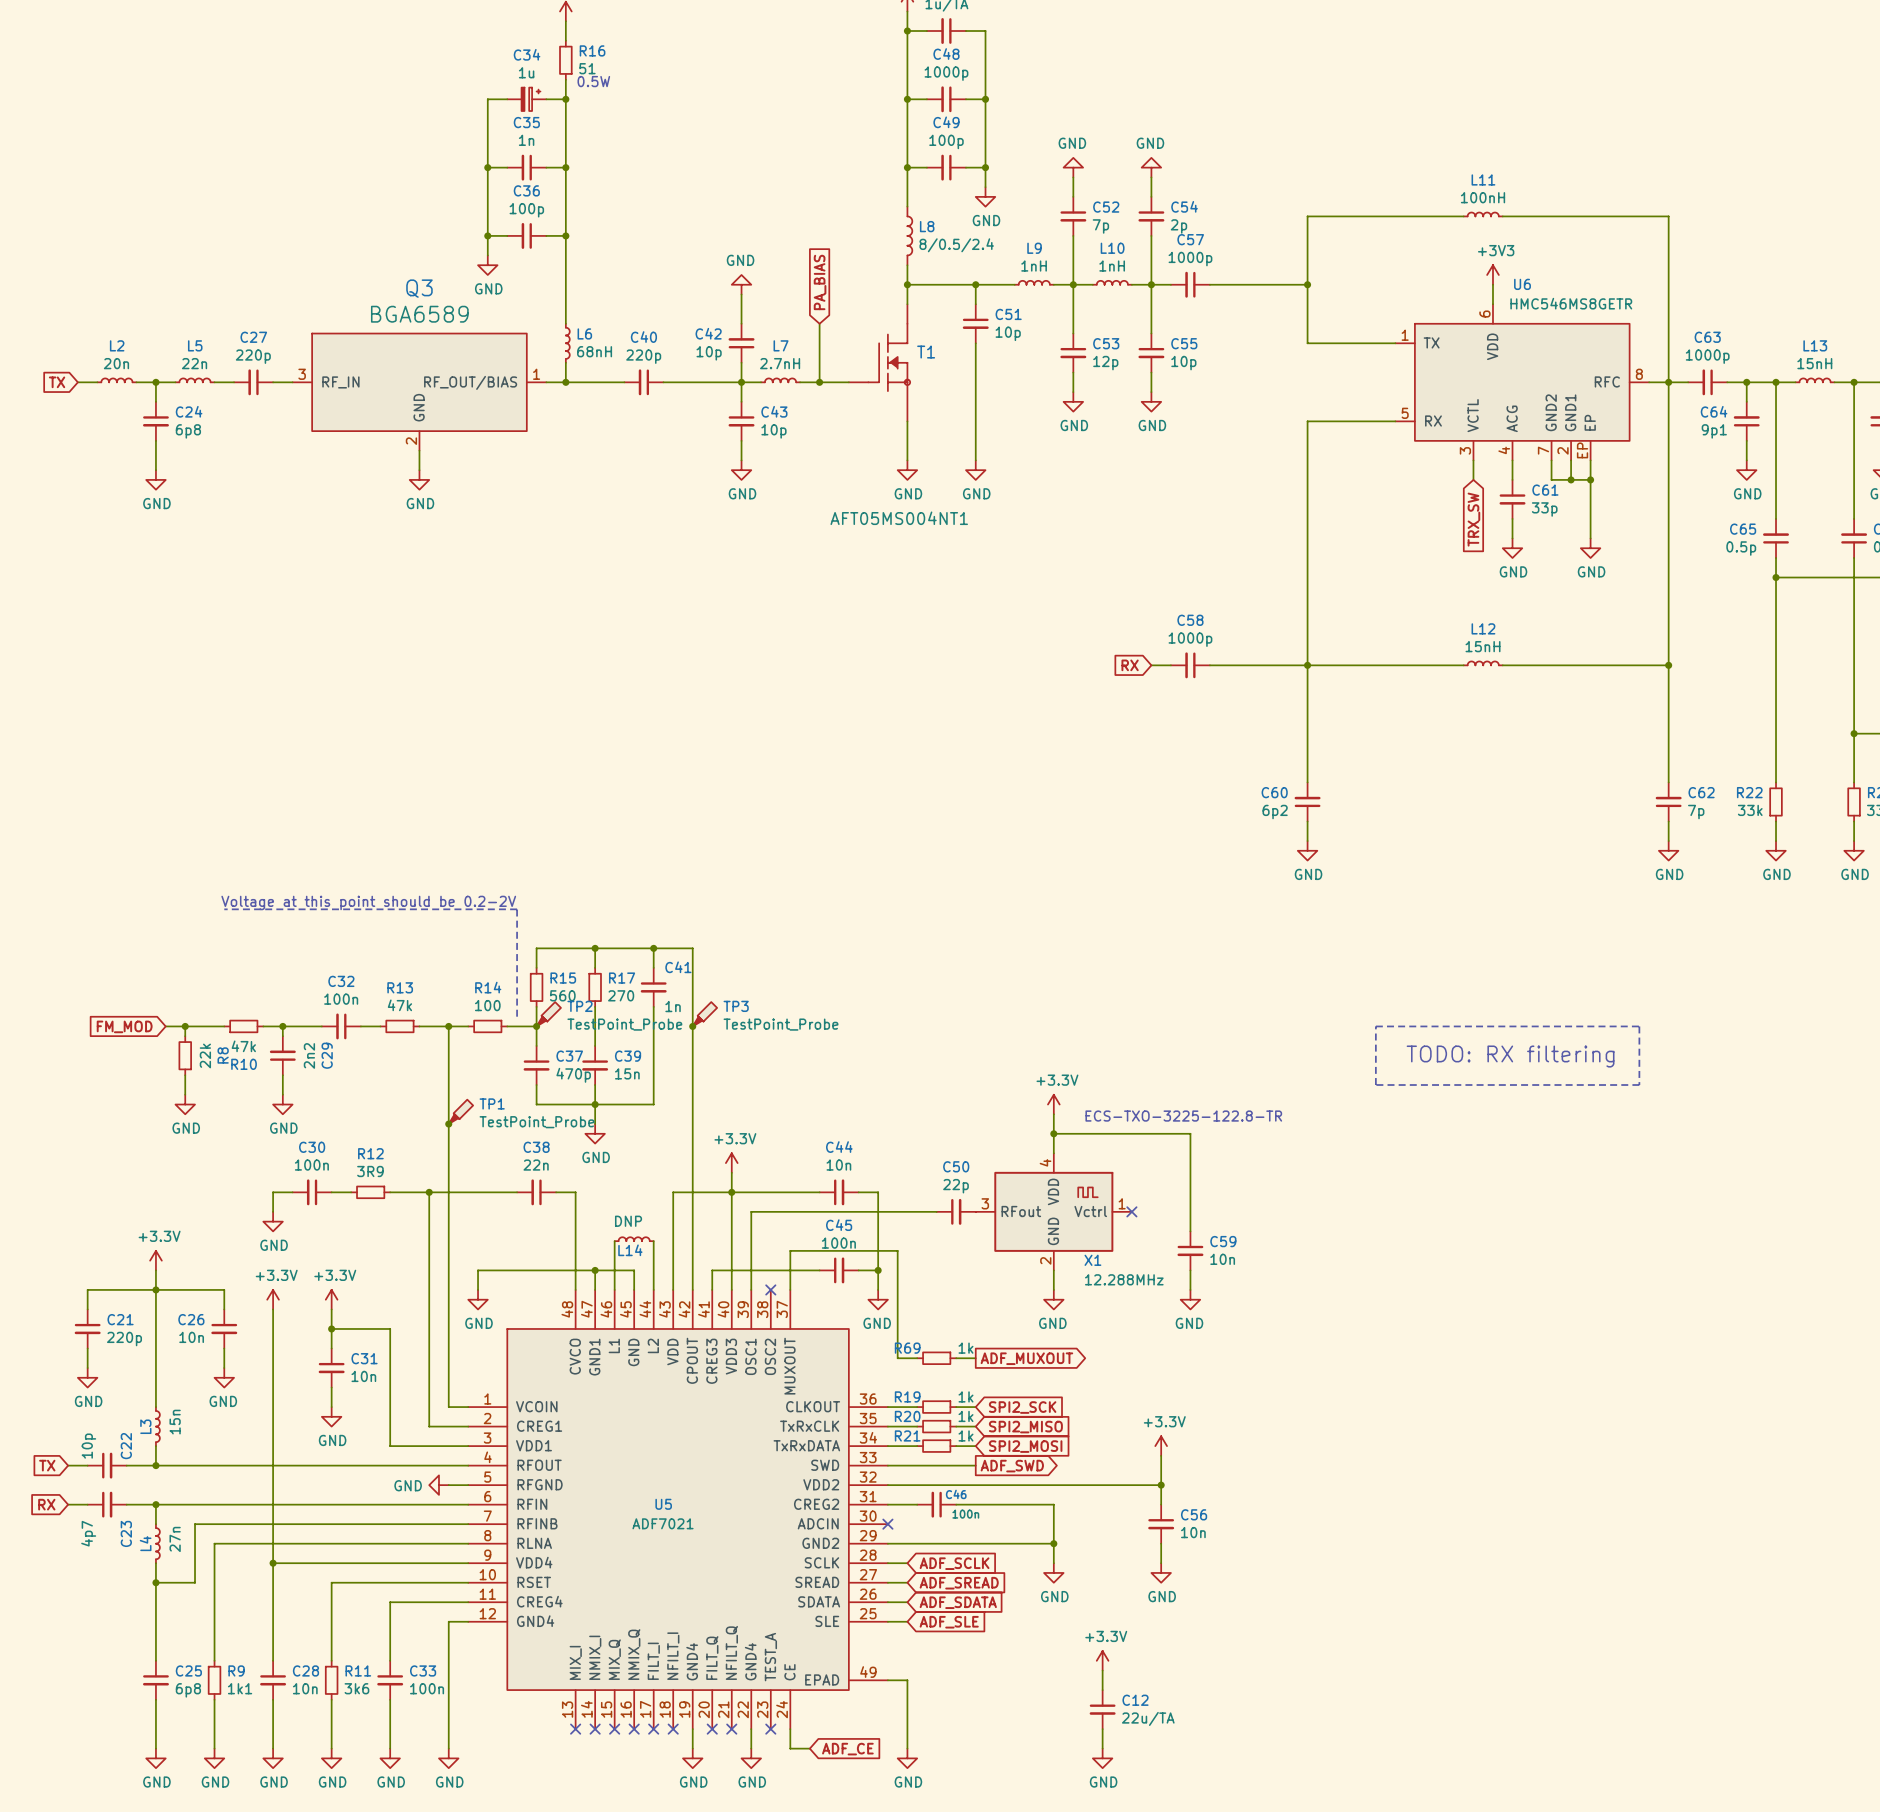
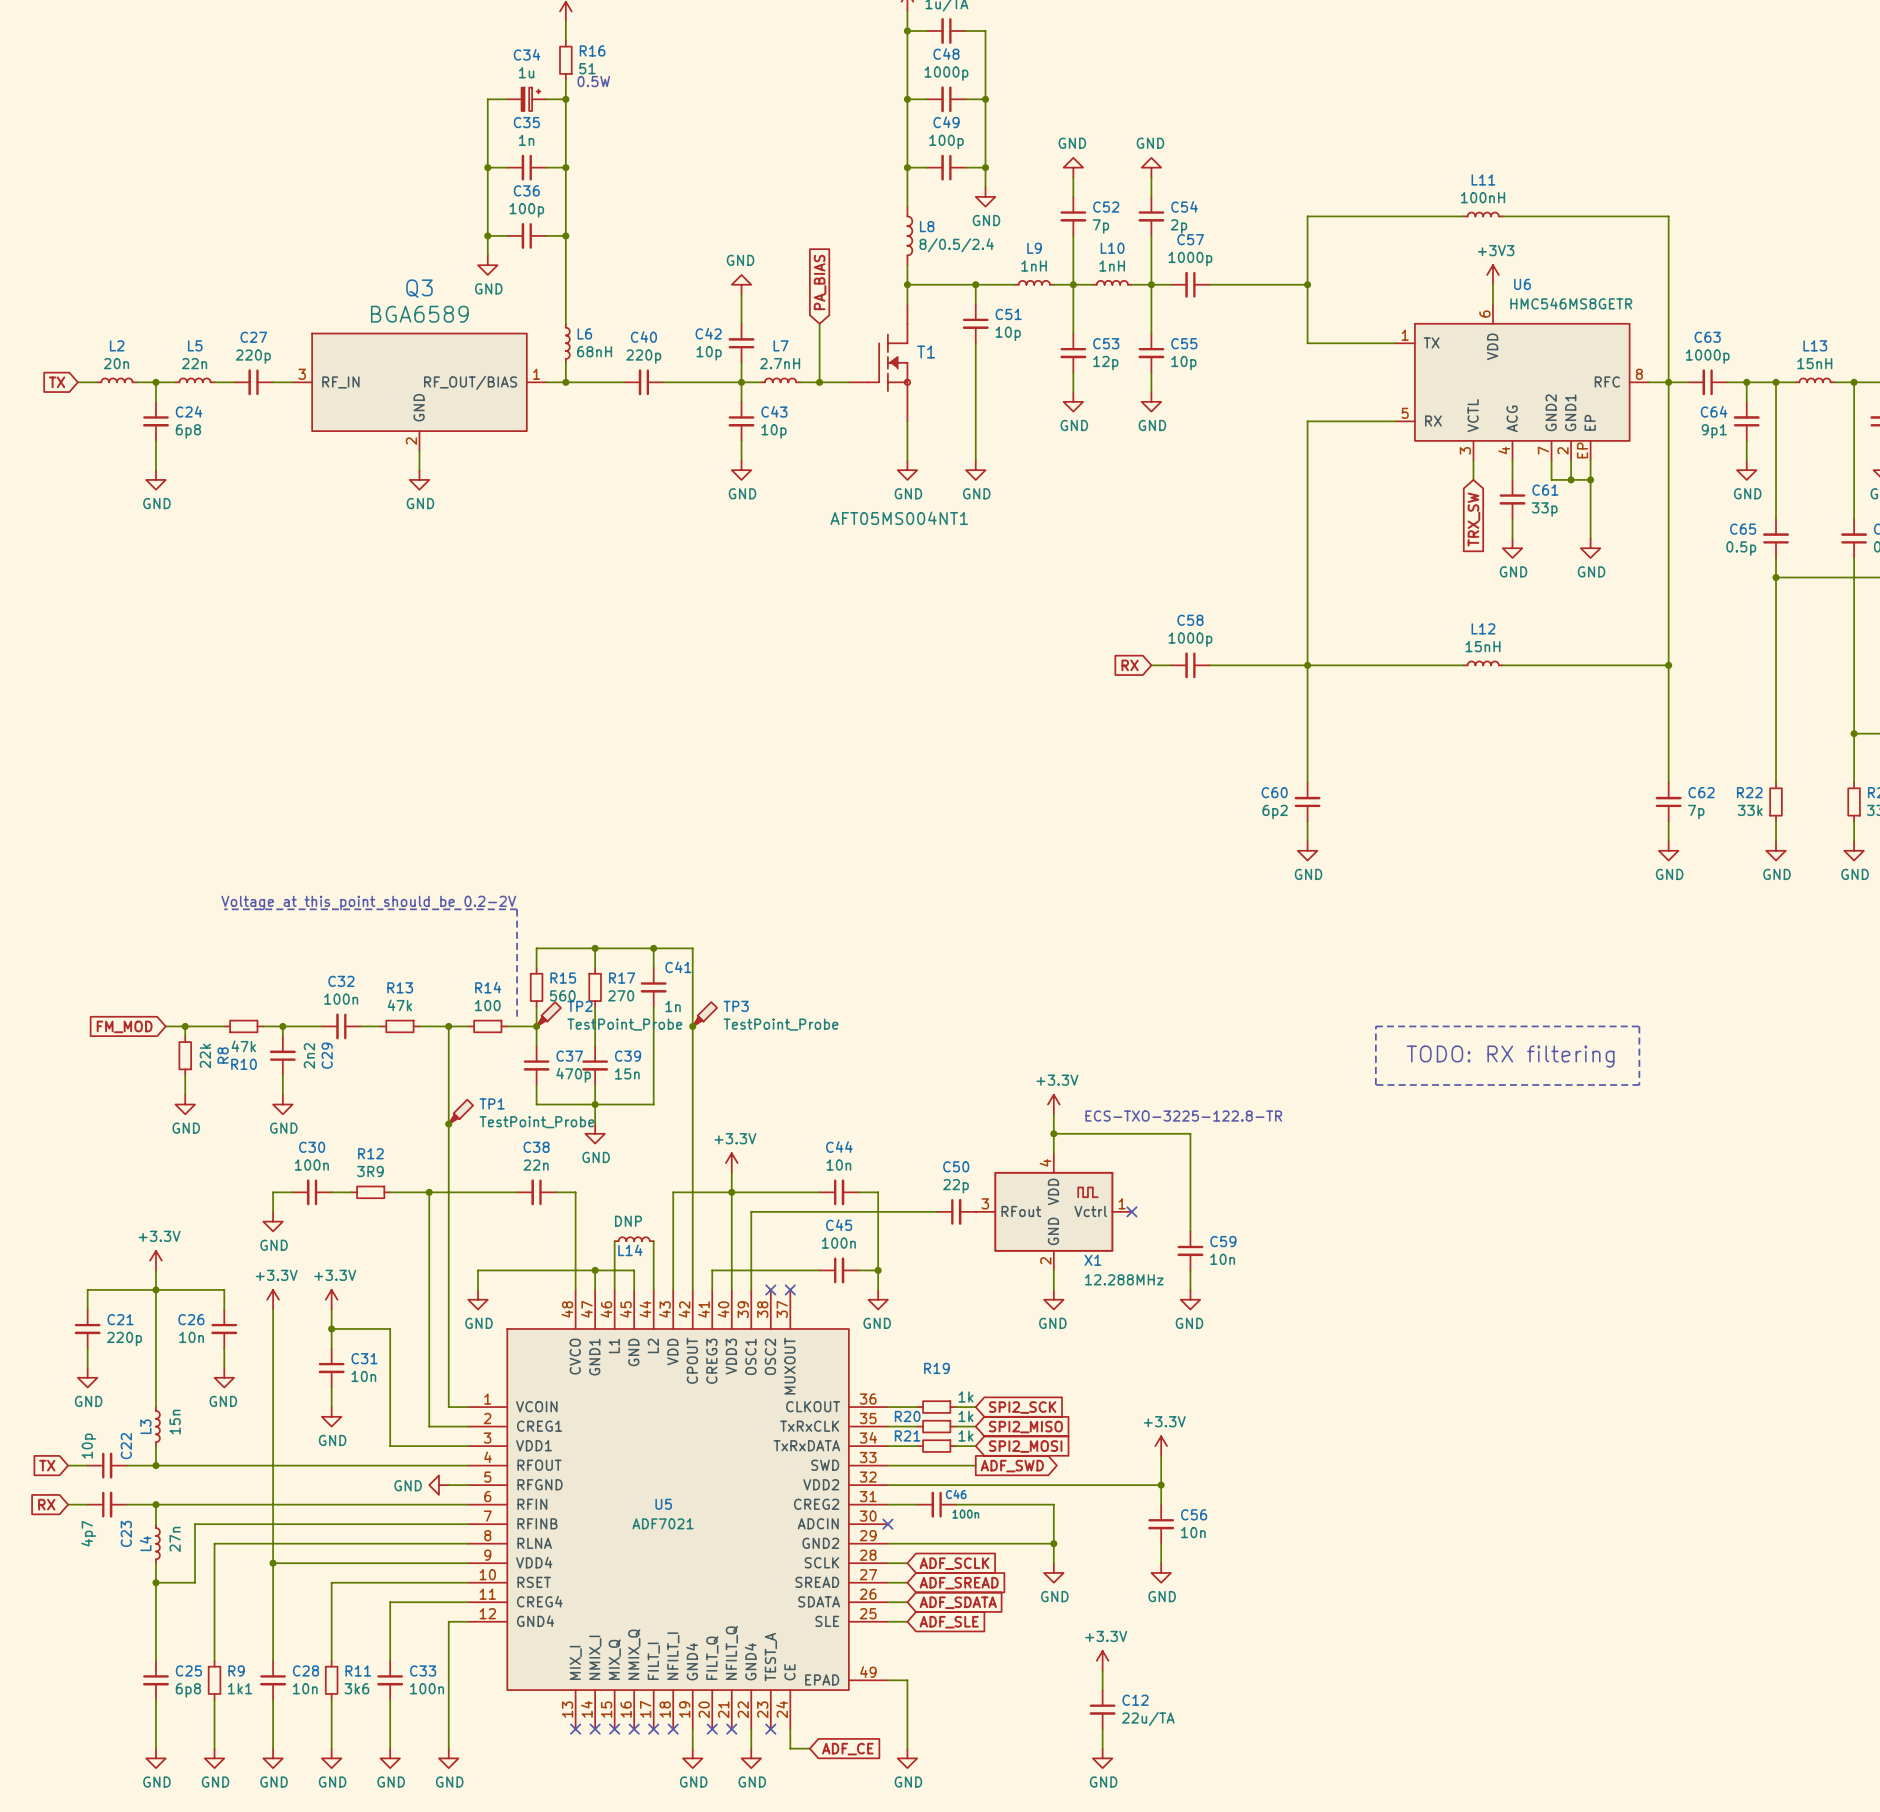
wire: (790, 1289) (790, 1250) (897, 1250) (897, 1358) (917, 1358) -> none
no-connect mark: none -> (790, 1289)
R69: 1k (936, 1358) -> none
wire: (956, 1358) (975, 1358) -> none
global label: ADF_MUXOUT (1026, 1358) -> none
R19 name position: R19 (907, 1396) -> R19 (936, 1368)

